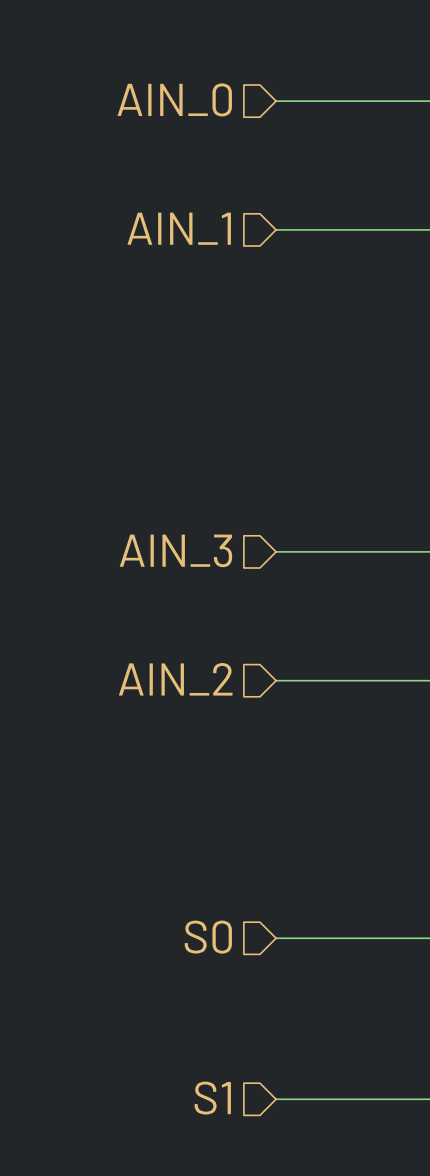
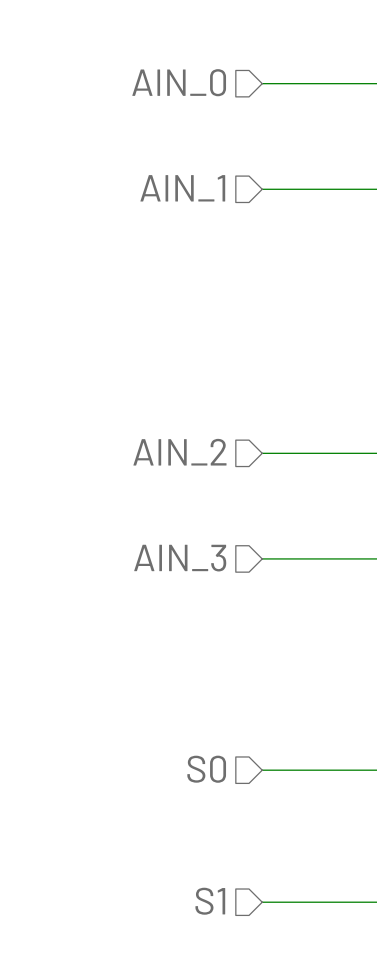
hierarchical label: AIN_3 (176, 550) -> AIN_2 (179, 452)
hierarchical label: AIN_2 (175, 679) -> AIN_3 (180, 558)

